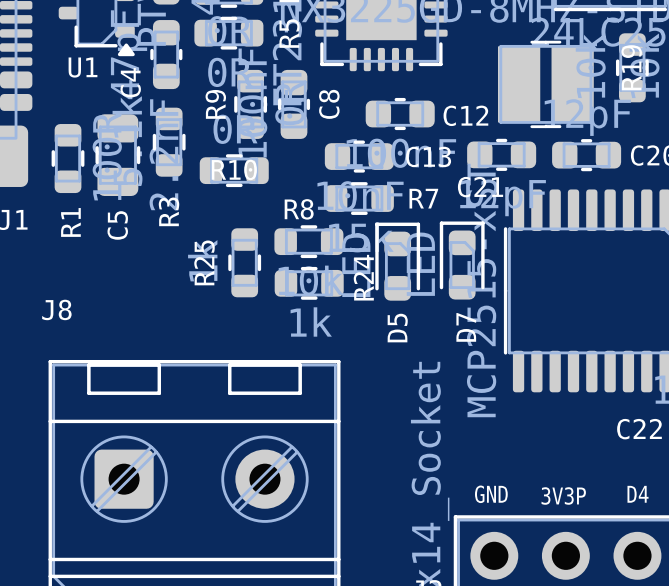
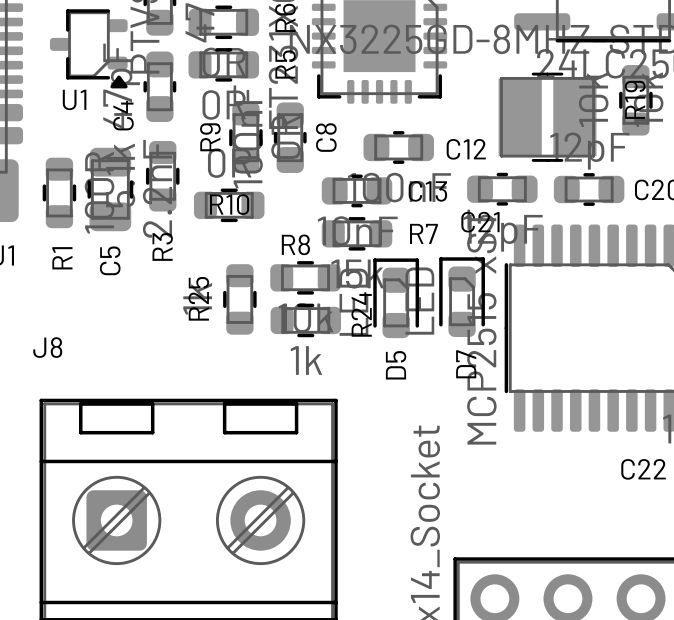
text: GND (491, 494) -> none
text: D4 (638, 494) -> none
text: 3V3P (563, 496) -> none

